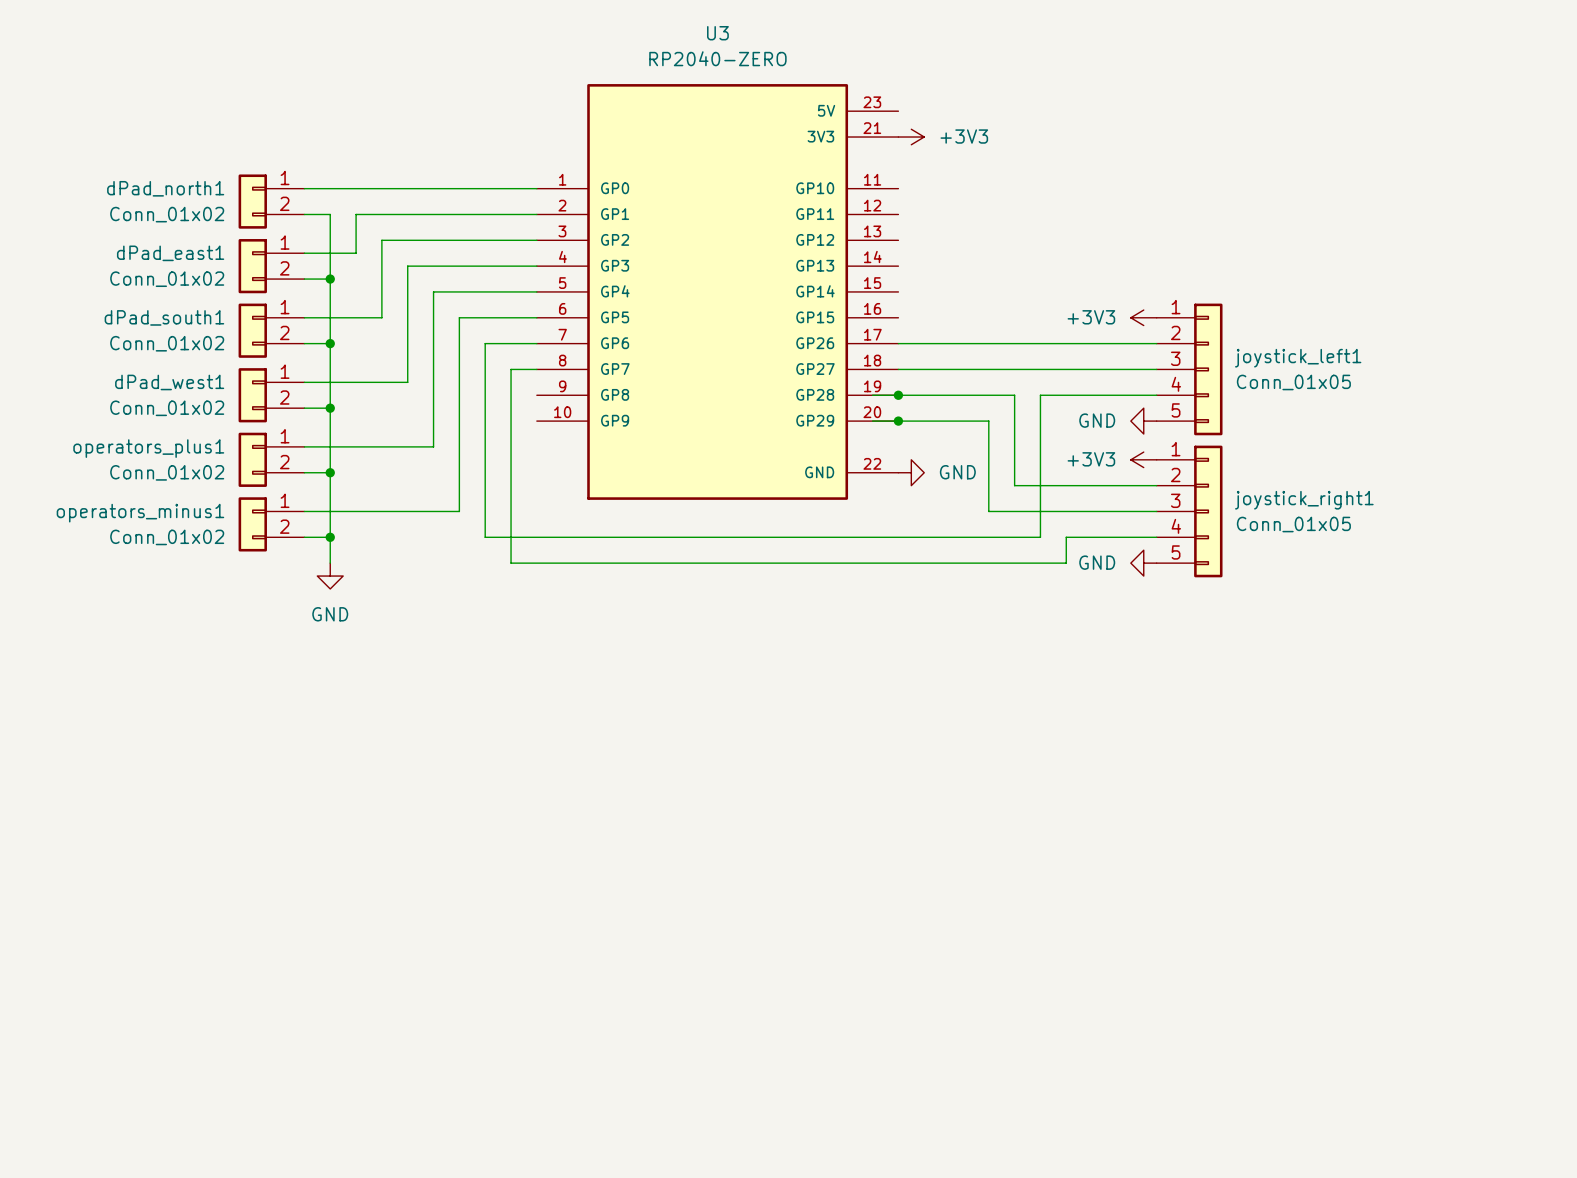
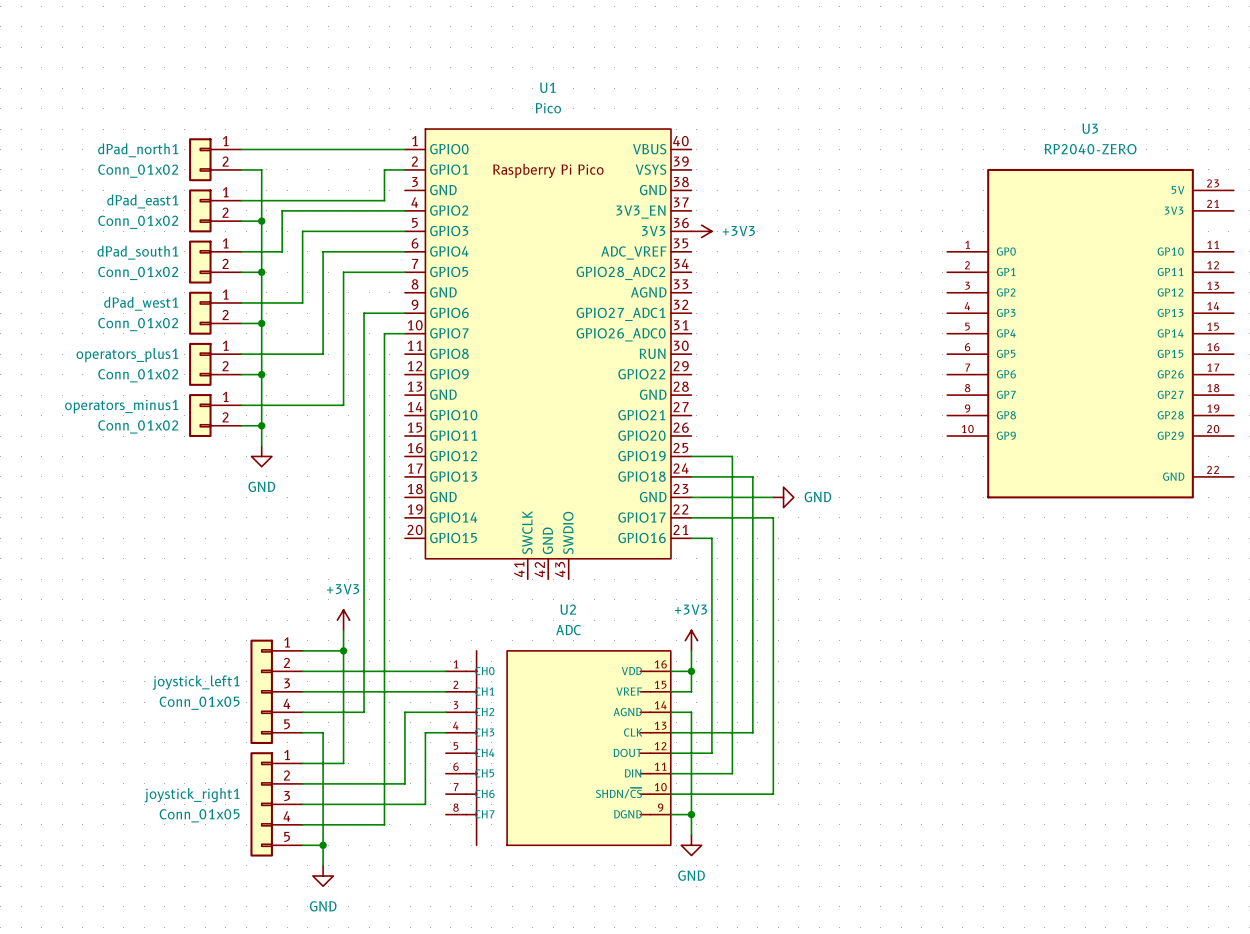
power symbol: +3V3 (911, 137) -> none
wire: (485, 214) (356, 214) (356, 253) -> (384, 169) (384, 200) (282, 200)
wire: (536, 240) (381, 240) (381, 291) -> (343, 231) (302, 231)
wire: (407, 266) (407, 317) -> (323, 210) (282, 210) (282, 251)
wire: (433, 291) (433, 343) -> (384, 272) (343, 272)
U3 position: (717, 291) -> (1090, 333)
power symbol: none -> +3V3 (701, 231)
wire: (356, 317) (381, 317) -> (302, 302) (302, 251)
wire: (459, 317) (459, 395) -> (364, 251) (323, 251)
power symbol: +3V3 (1143, 317) -> none
wire: (485, 343) (485, 421) -> (404, 333) (384, 333)
wire: (898, 343) (1156, 343) -> none
wire: (536, 369) (511, 369) (511, 563) (1066, 563) (1066, 537) (1156, 537) -> none
wire: (898, 369) (1156, 369) -> none
joystick_left1 position: (1189, 369) -> (276, 691)
joystick_left1 flip: as is (1208, 369) -> left-right (261, 691)
wire: (381, 382) (407, 382) -> (323, 354) (323, 302)
wire: none -> (364, 313) (404, 313)
wire: (872, 395) (1014, 395) (1014, 485) (1156, 485) -> none
junction: (898, 395) -> none
wire: (1156, 395) (1040, 395) (1040, 537) (485, 537) -> (302, 824) (384, 824) (384, 425)
wire: (872, 421) (988, 421) (988, 511) (1156, 511) -> none
junction: (898, 421) -> none
power symbol: GND (1143, 421) -> none
wire: (407, 446) (433, 446) -> none
U1: none -> Pico (548, 354)
power symbol: +3V3 (1143, 459) -> none
power symbol: GND (911, 472) -> none
wire: (433, 511) (459, 511) -> (343, 405) (343, 354)
wire: none -> (364, 405) (364, 712) (302, 712)
joystick_right1 position: (1189, 511) -> (276, 804)
joystick_right1 flip: as is (1208, 511) -> left-right (261, 804)
power symbol: GND (1143, 563) -> none
wire: none -> (691, 456) (732, 456) (732, 773) (670, 773)
wire: none -> (691, 476) (752, 476) (752, 732) (670, 732)
wire: none -> (691, 497) (773, 497)
power symbol: none -> GND (783, 497)
wire: none -> (691, 517) (773, 517) (773, 794) (670, 794)
wire: none -> (691, 538) (711, 538) (711, 753) (670, 753)
power symbol: none -> +3V3 (343, 620)
wire: none -> (343, 630) (343, 763) (302, 763)
power symbol: none -> +3V3 (691, 640)
wire: none -> (302, 650) (343, 650)
junction: none -> (343, 650)
wire: none -> (691, 650) (691, 691) (670, 691)
wire: none -> (302, 671) (445, 671)
wire: none -> (670, 671) (691, 671)
junction: none -> (691, 671)
wire: none -> (302, 691) (445, 691)
wire: none -> (445, 712) (404, 712) (404, 783) (302, 783)
wire: none -> (670, 712) (691, 712) (691, 835)
wire: none -> (302, 732) (323, 732) (323, 865)
wire: none -> (445, 732) (425, 732) (425, 804) (302, 804)
U2: none -> ADC (558, 748)
wire: none -> (670, 814) (691, 814)
junction: none -> (691, 814)
wire: none -> (302, 845) (323, 845)
junction: none -> (323, 845)
power symbol: none -> GND (691, 845)
power symbol: none -> GND (323, 876)

